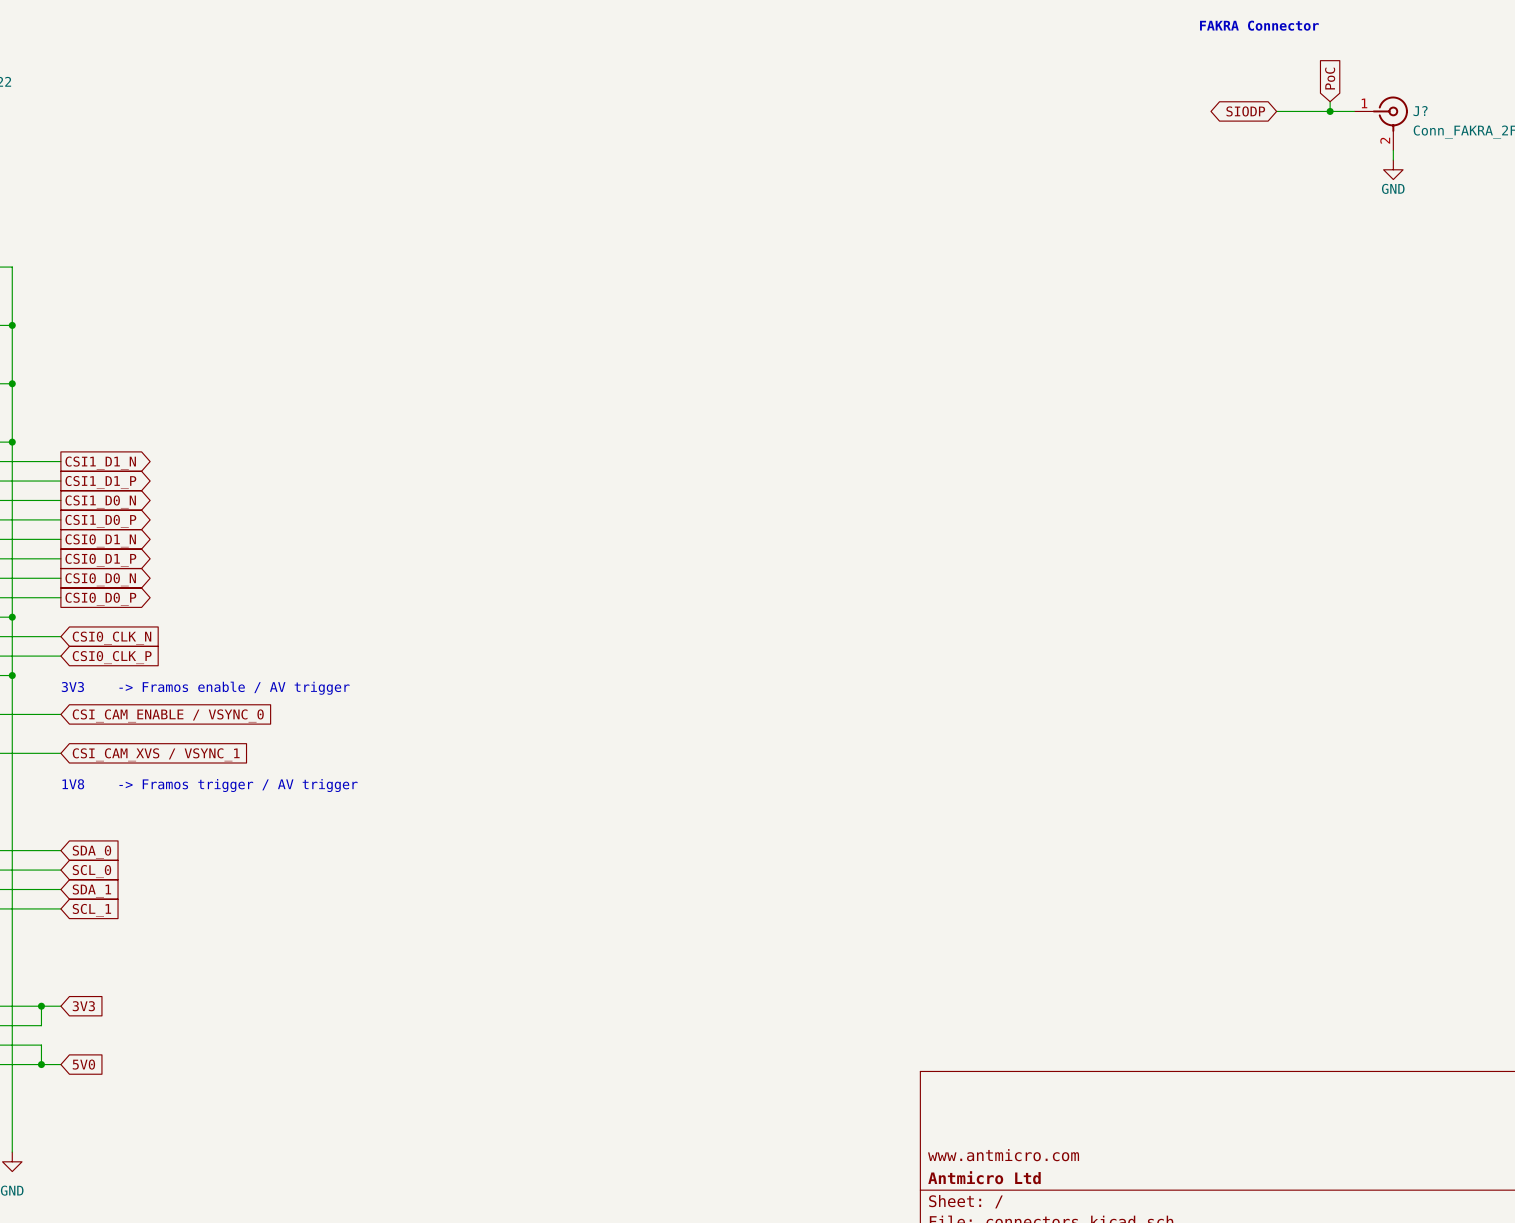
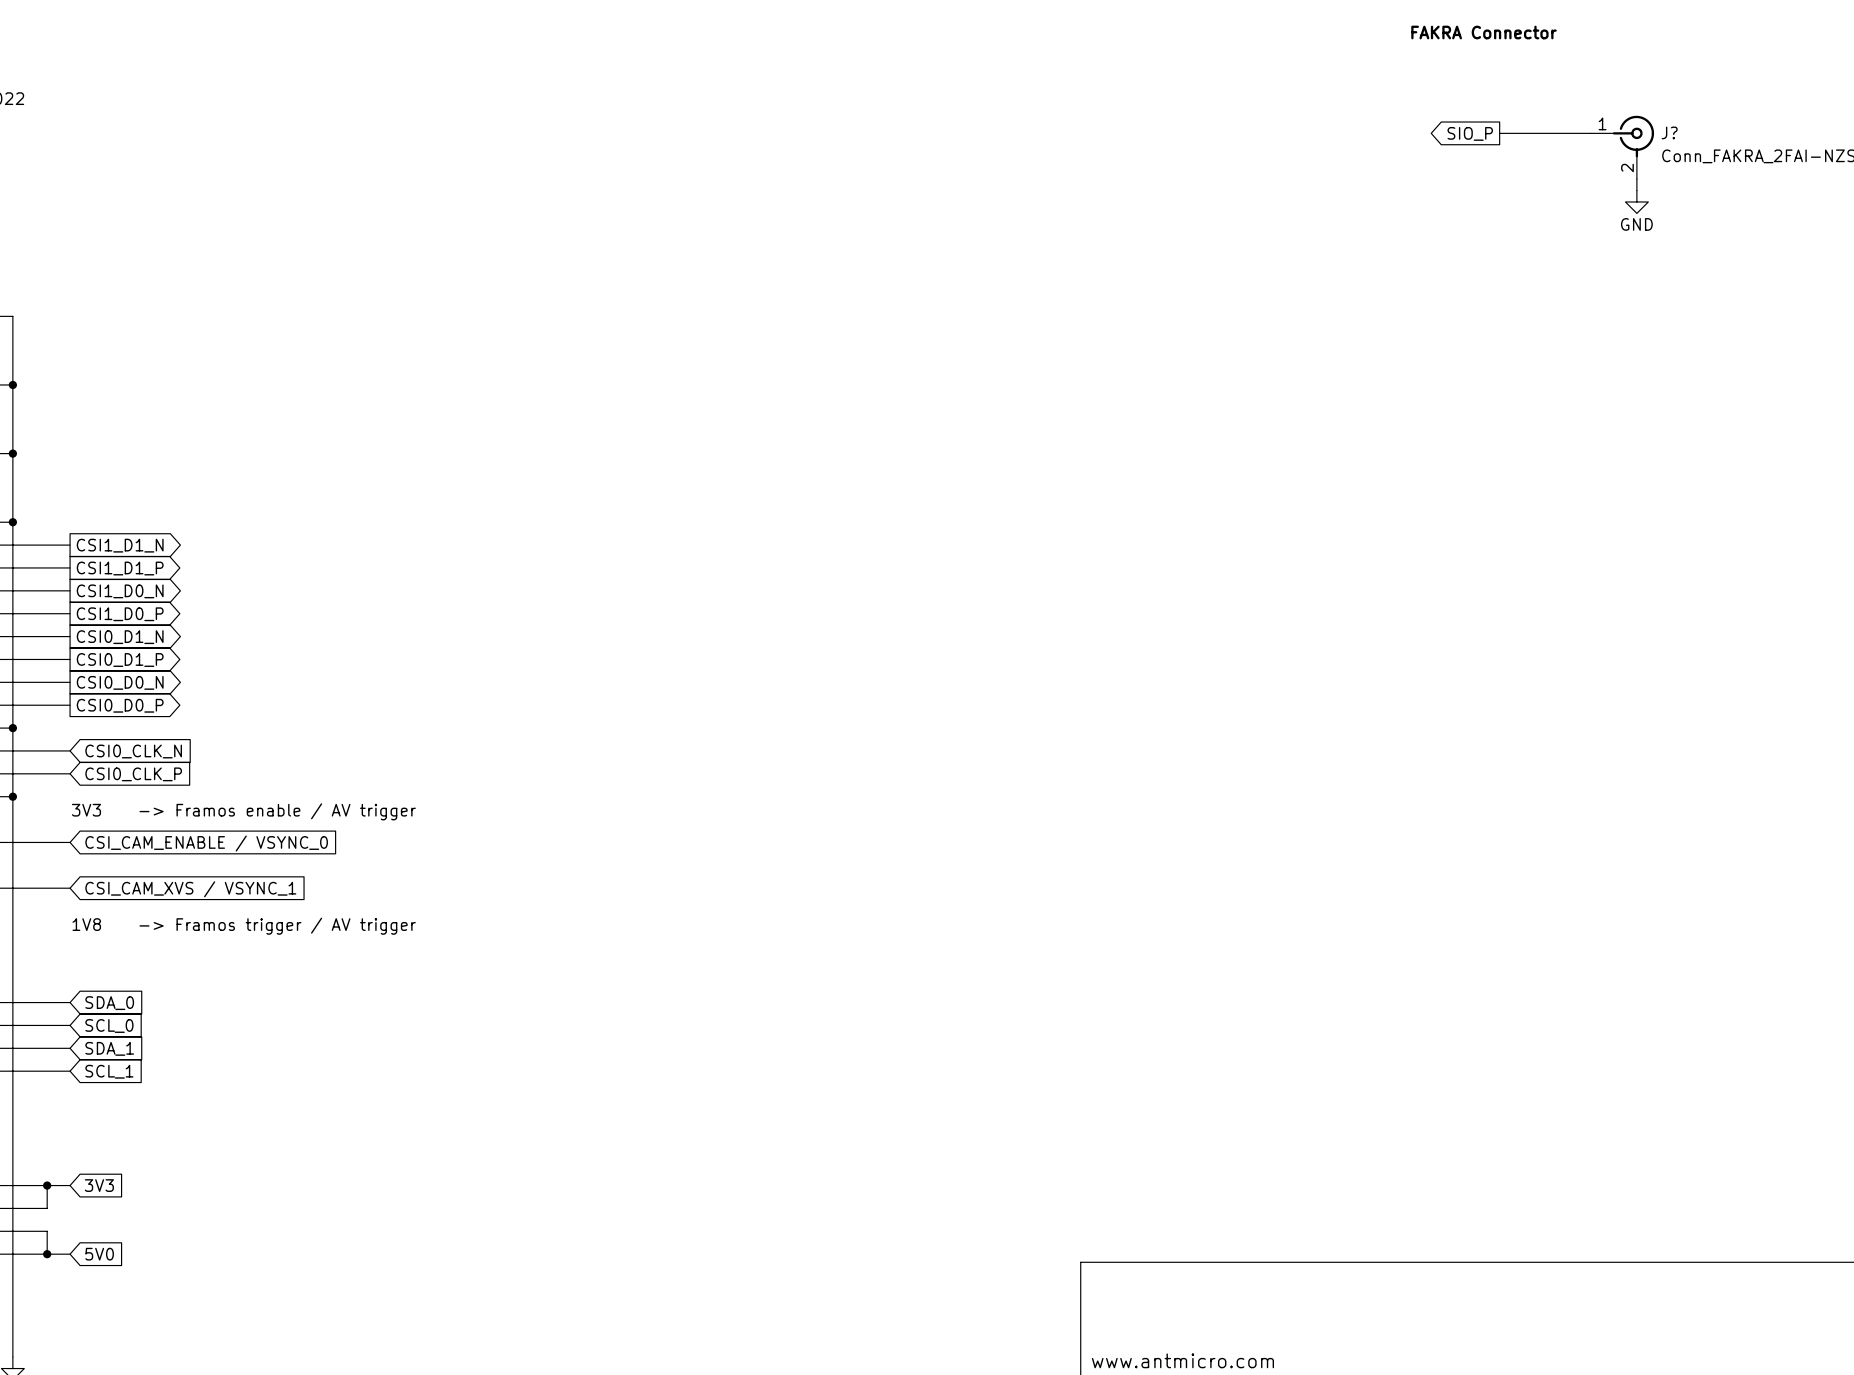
global label: PoC (1330, 78) -> none
wire: (1330, 101) (1330, 111) -> none
global label shape: bidirectional (1245, 111) -> output (1470, 133)
global label: SIODP (1245, 111) -> SIO_P (1470, 133)
junction: (1330, 111) -> none

